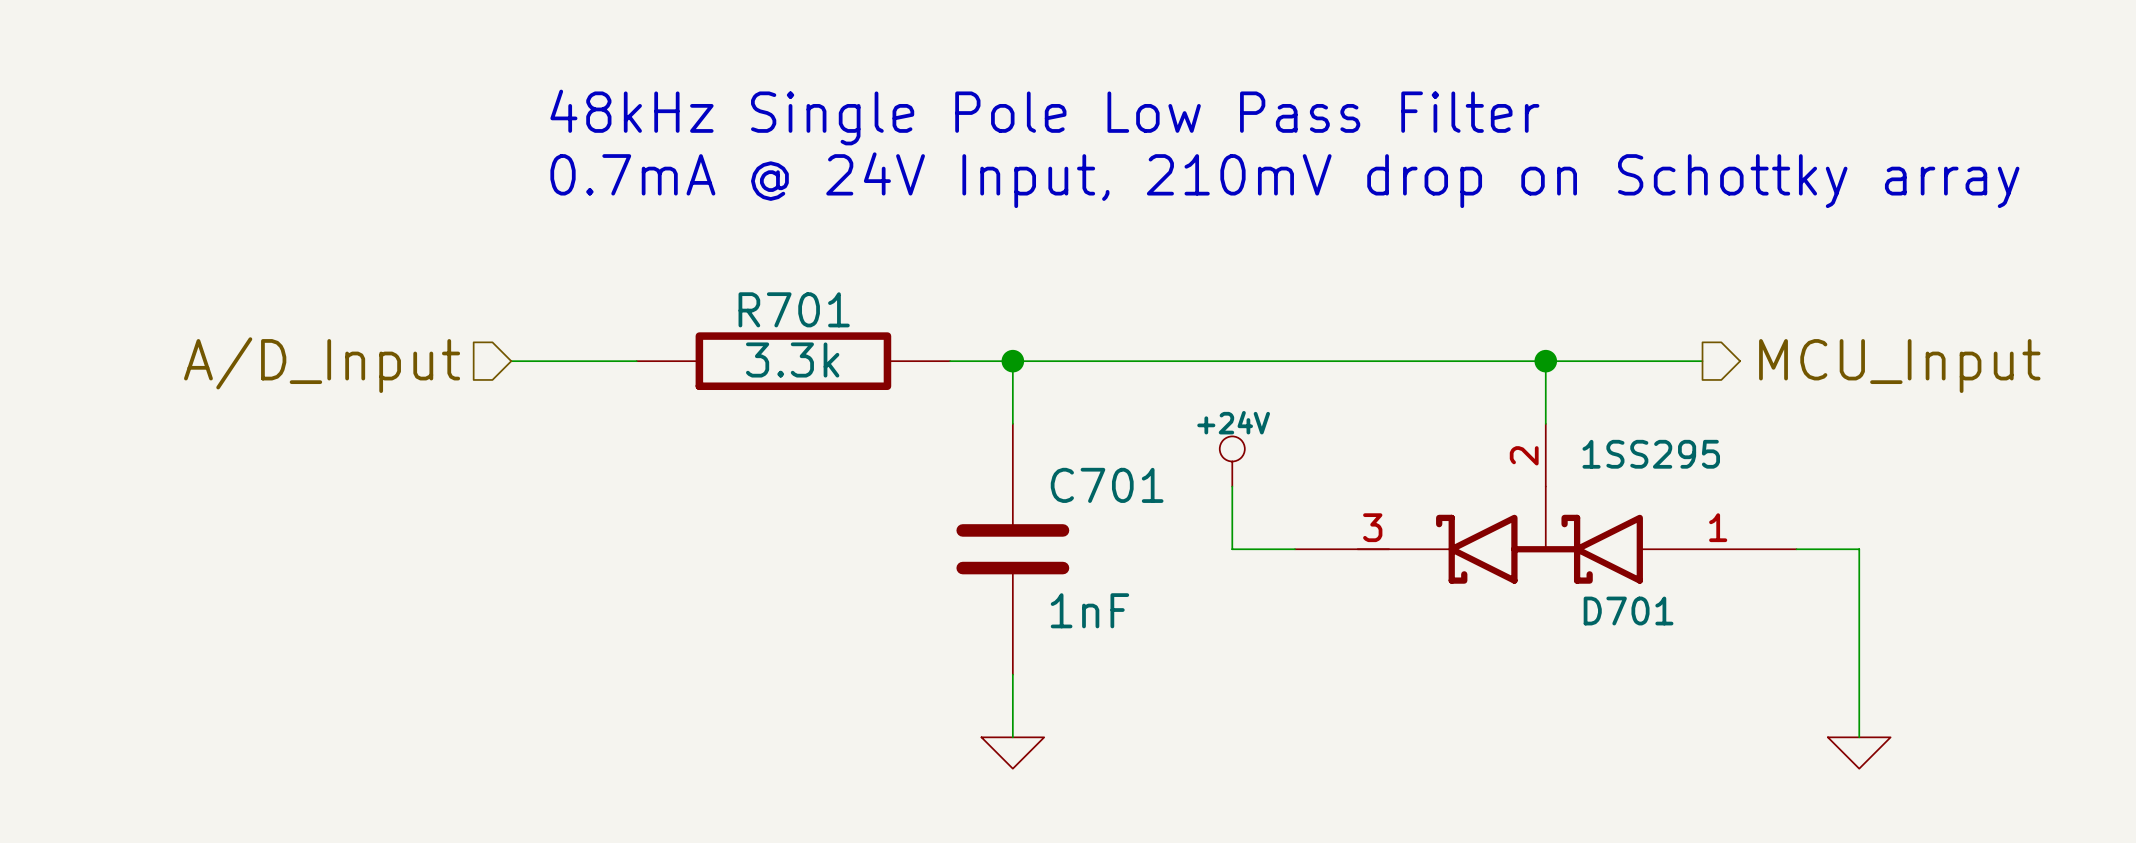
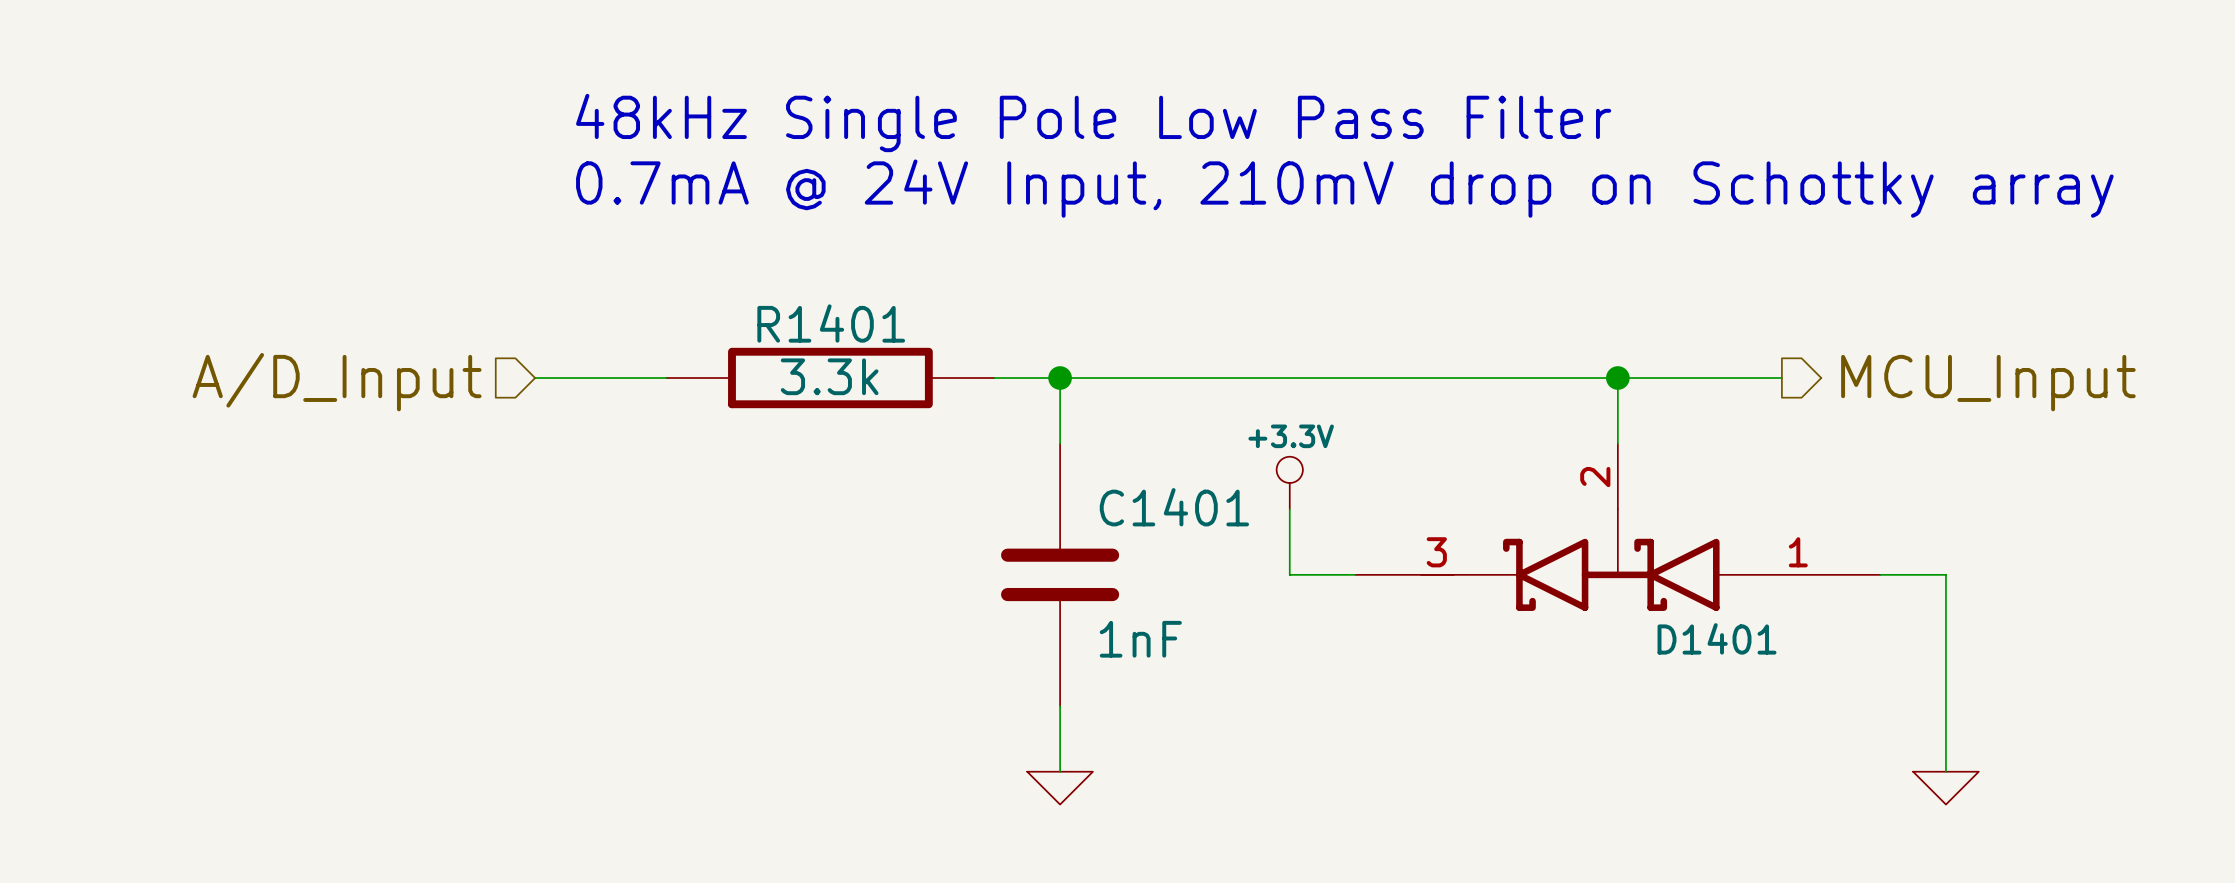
R701 name: R701 (794, 309) -> R1401 (831, 323)
D701 value: 1SS295 (1651, 454) -> none
power symbol: +24V (1232, 461) -> +3.3V (1289, 483)
C701 name: C701 (1107, 485) -> C1401 (1174, 507)
D701 name: D701 (1628, 611) -> D1401 (1717, 638)

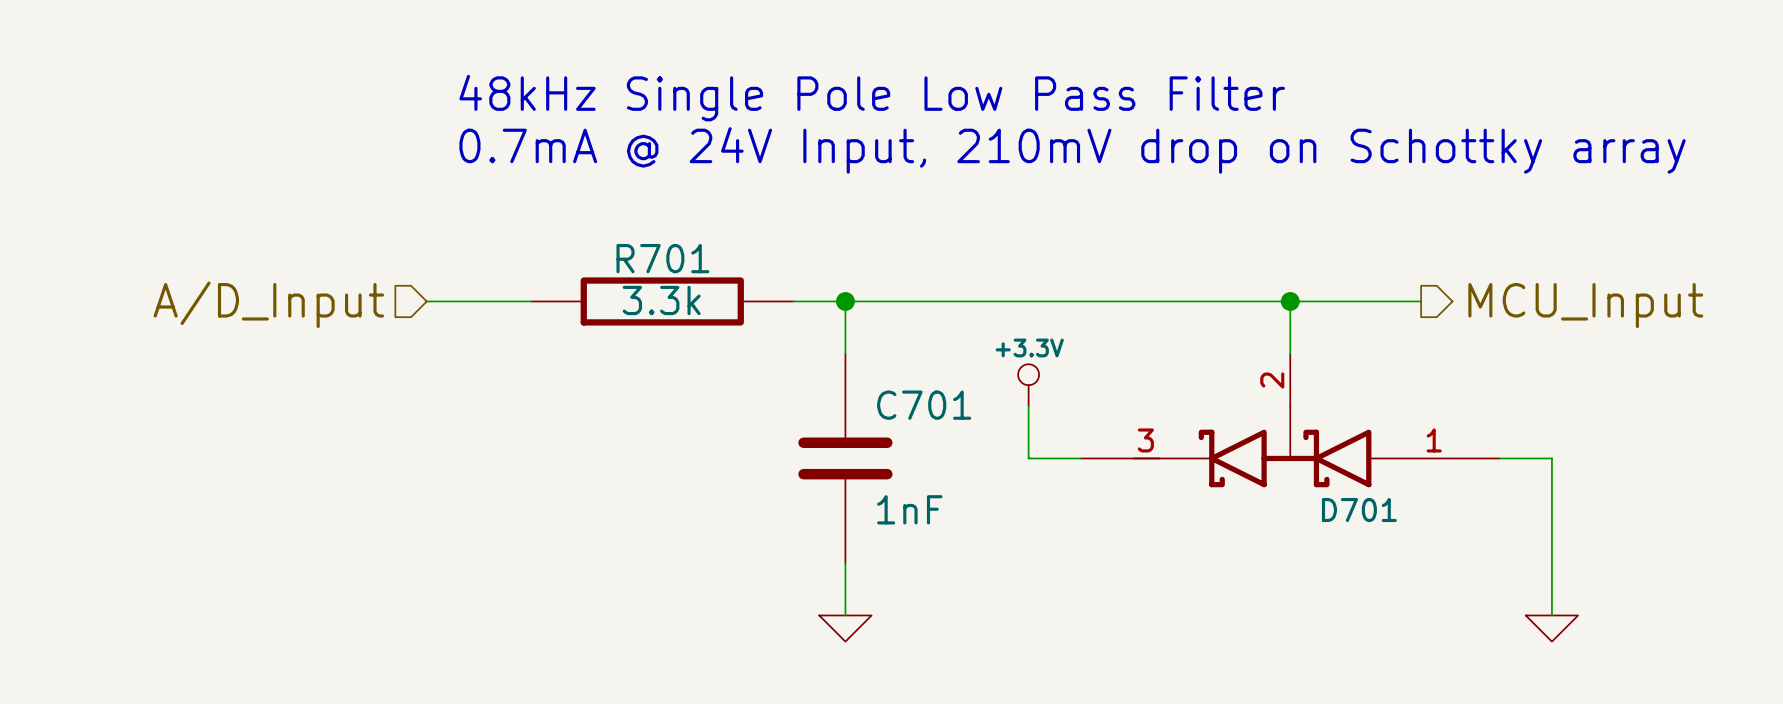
R1401 name: R1401 (831, 323) -> R701 (662, 258)
C1401 name: C1401 (1174, 507) -> C701 (924, 405)
D1401 name: D1401 (1717, 638) -> D701 (1359, 510)

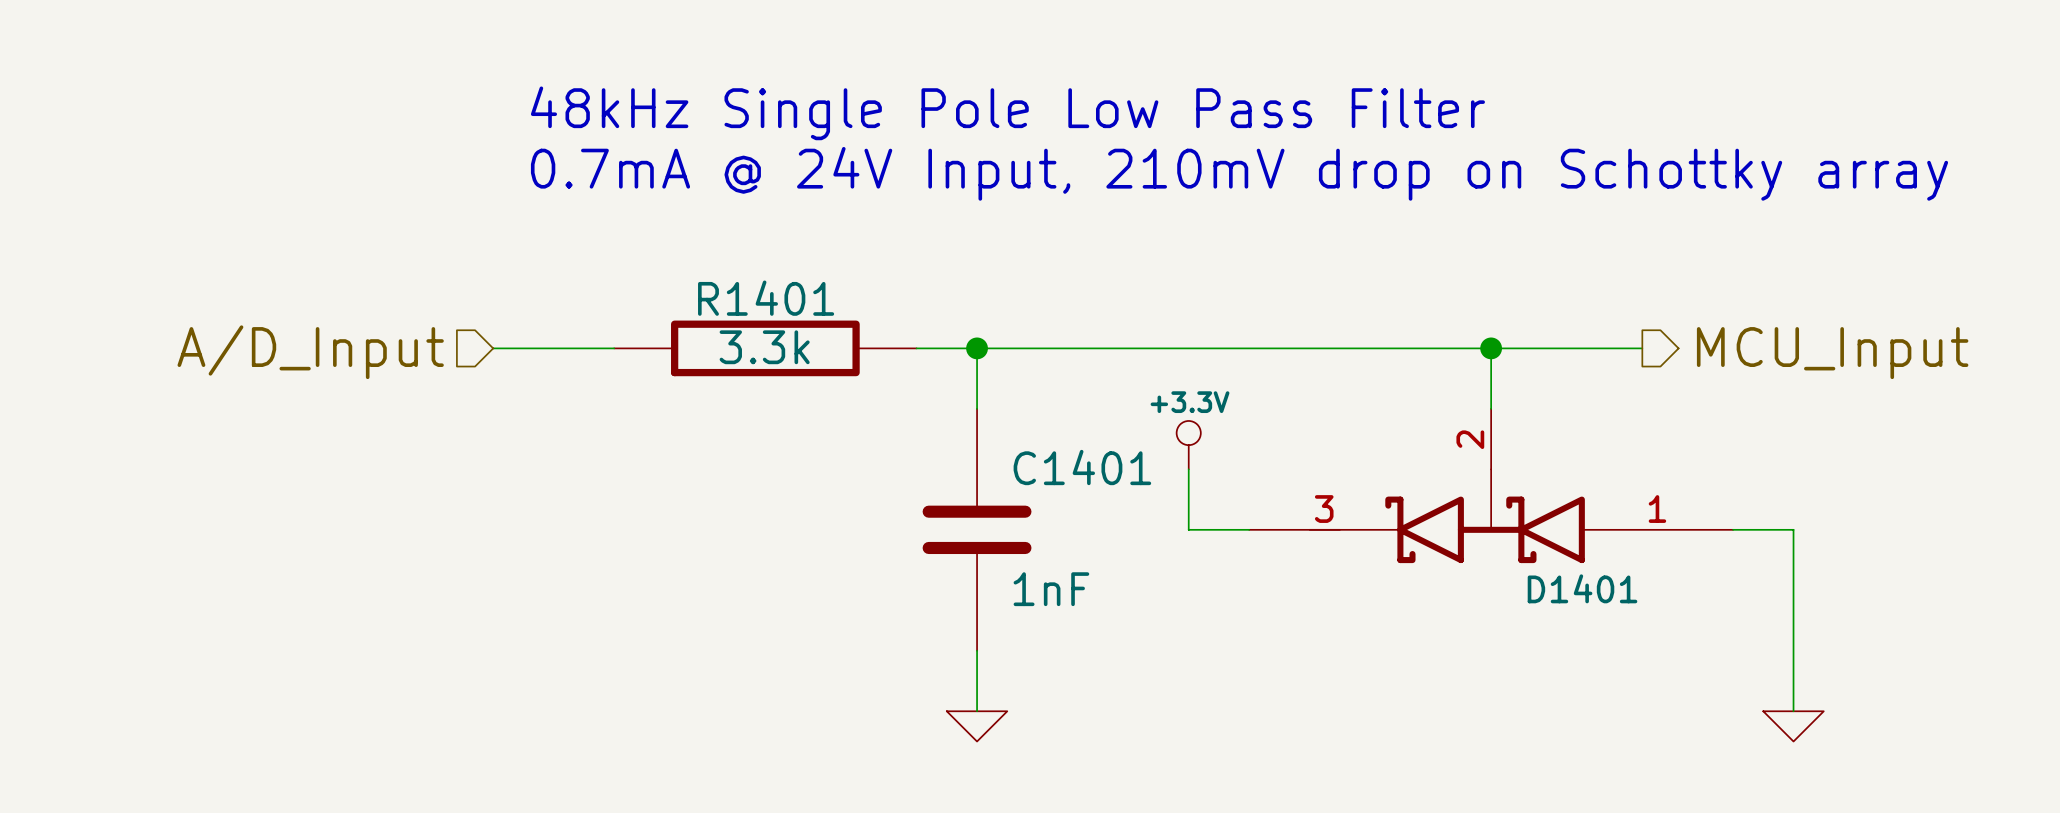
R701 name: R701 (662, 258) -> R1401 (766, 298)
C701 name: C701 (924, 405) -> C1401 (1082, 467)
D701 name: D701 (1359, 510) -> D1401 (1582, 588)

